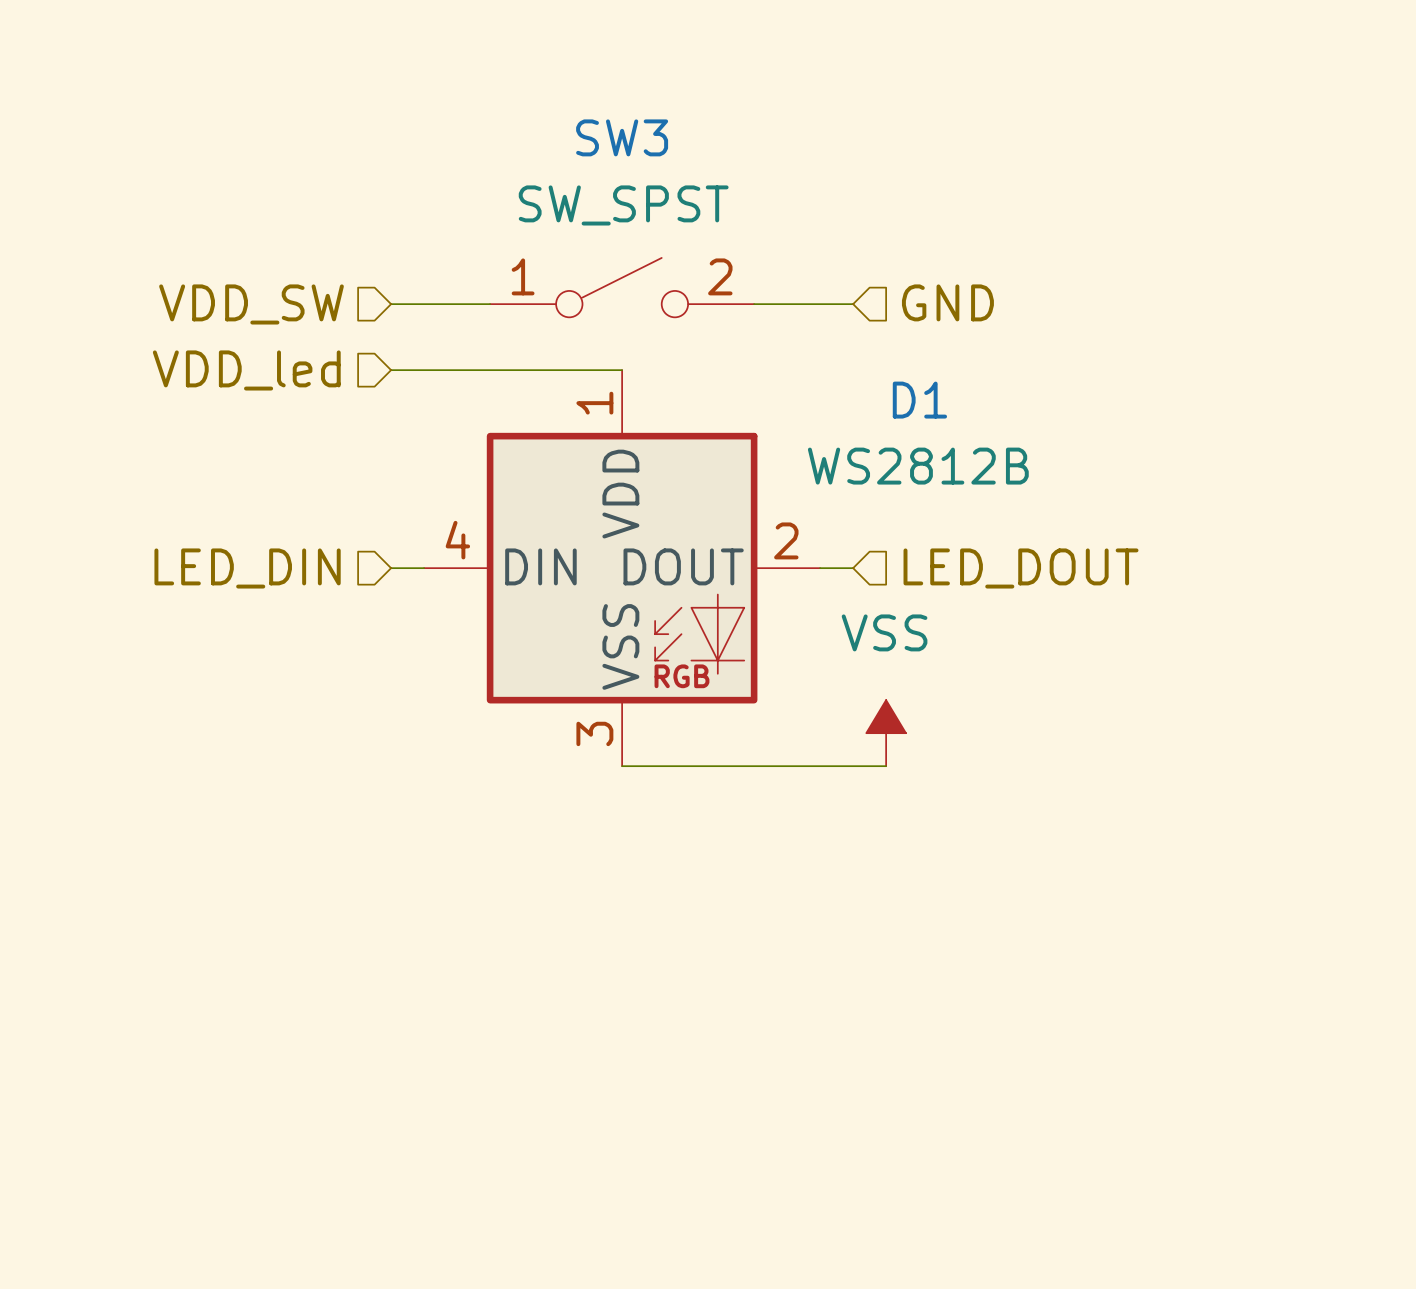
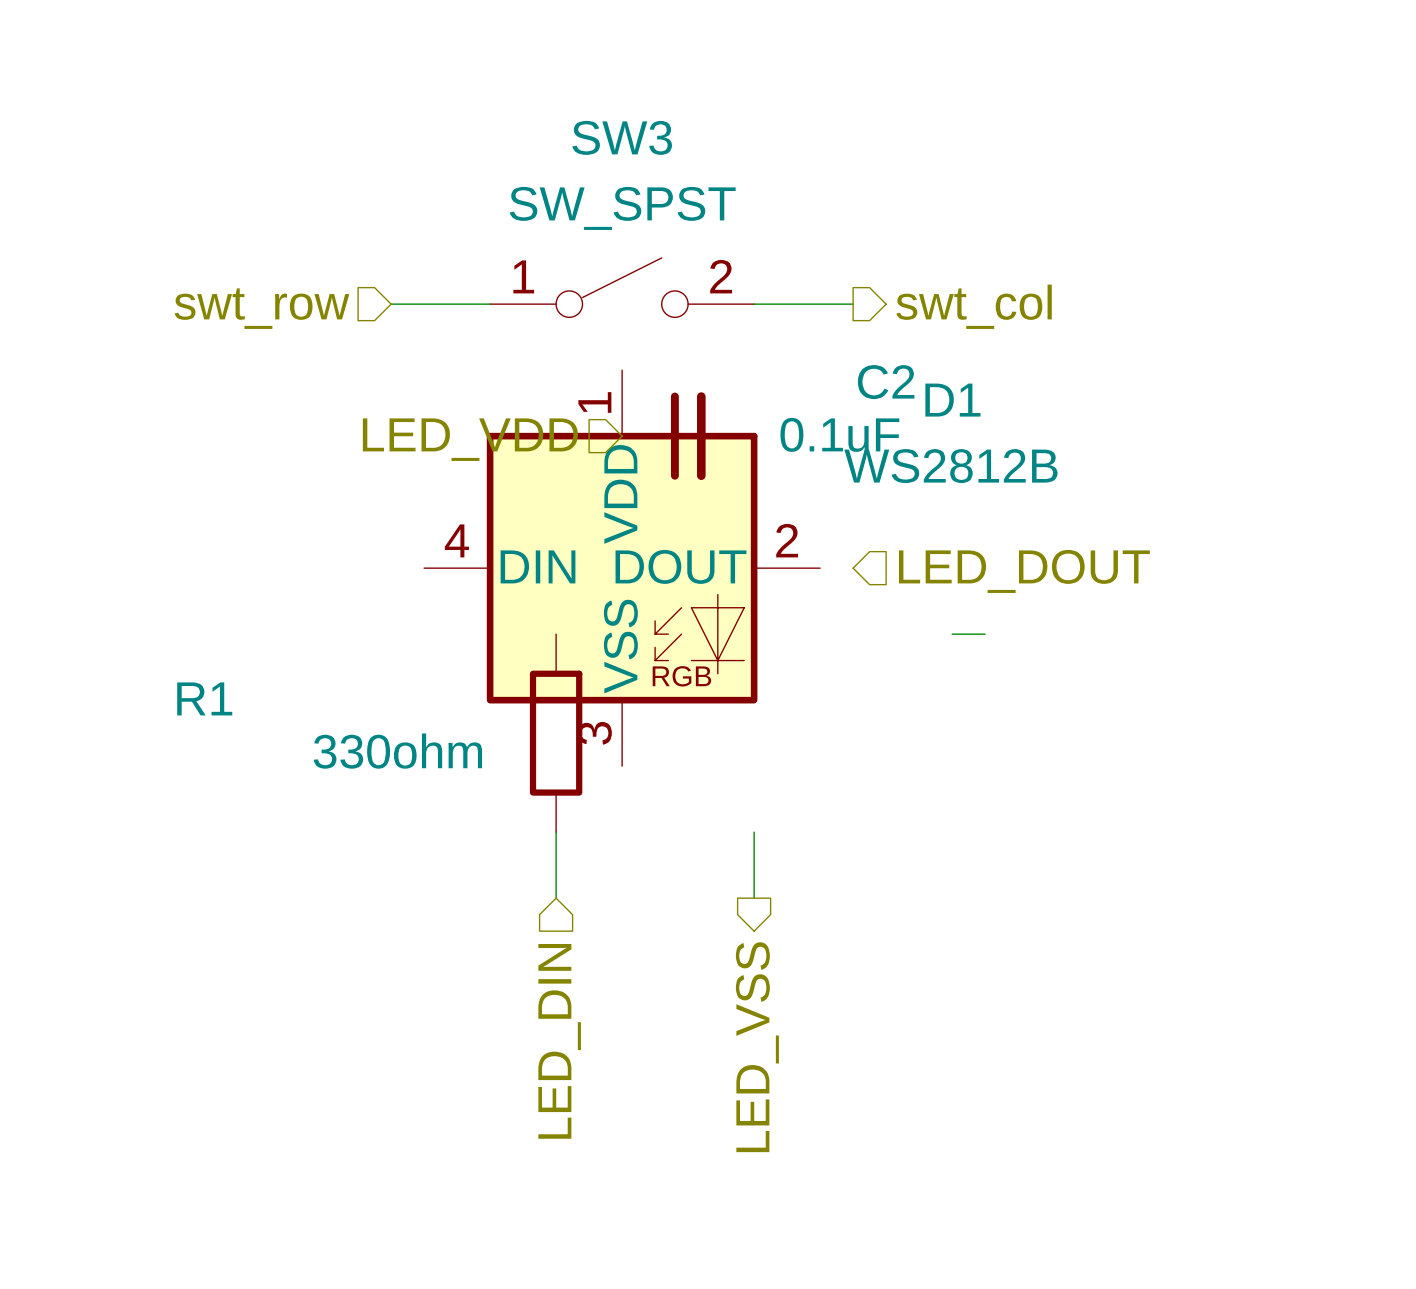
hierarchical label shape: input (947, 302) -> output (974, 306)
hierarchical label: GND (947, 302) -> swt_col (974, 306)
hierarchical label: VDD_SW (251, 304) -> swt_row (261, 308)
hierarchical label: VDD_led (246, 370) -> none
wire: (391, 370) (622, 370) -> none
D1 name position: D1 (919, 400) -> D1 (952, 400)
hierarchical label: none -> LED_VDD (470, 439)
C2: none -> (688, 436)
D1 value position: WS2812B (918, 466) -> WS2812B (950, 466)
hierarchical label rotation: 0° (247, 568) -> 90° counterclockwise (559, 1041)
hierarchical label position: LED_DIN (247, 568) -> LED_DIN (559, 1041)
wire: (391, 568) (424, 568) -> none
wire: (820, 568) (853, 568) -> (952, 634) (985, 634)
R1: none -> 330ohm (556, 733)
power symbol: VSS (886, 733) -> none
wire: (622, 766) (886, 766) -> none
wire: none -> (556, 832) (556, 898)
wire: none -> (754, 832) (754, 898)
hierarchical label: none -> LED_VSS (757, 1047)

